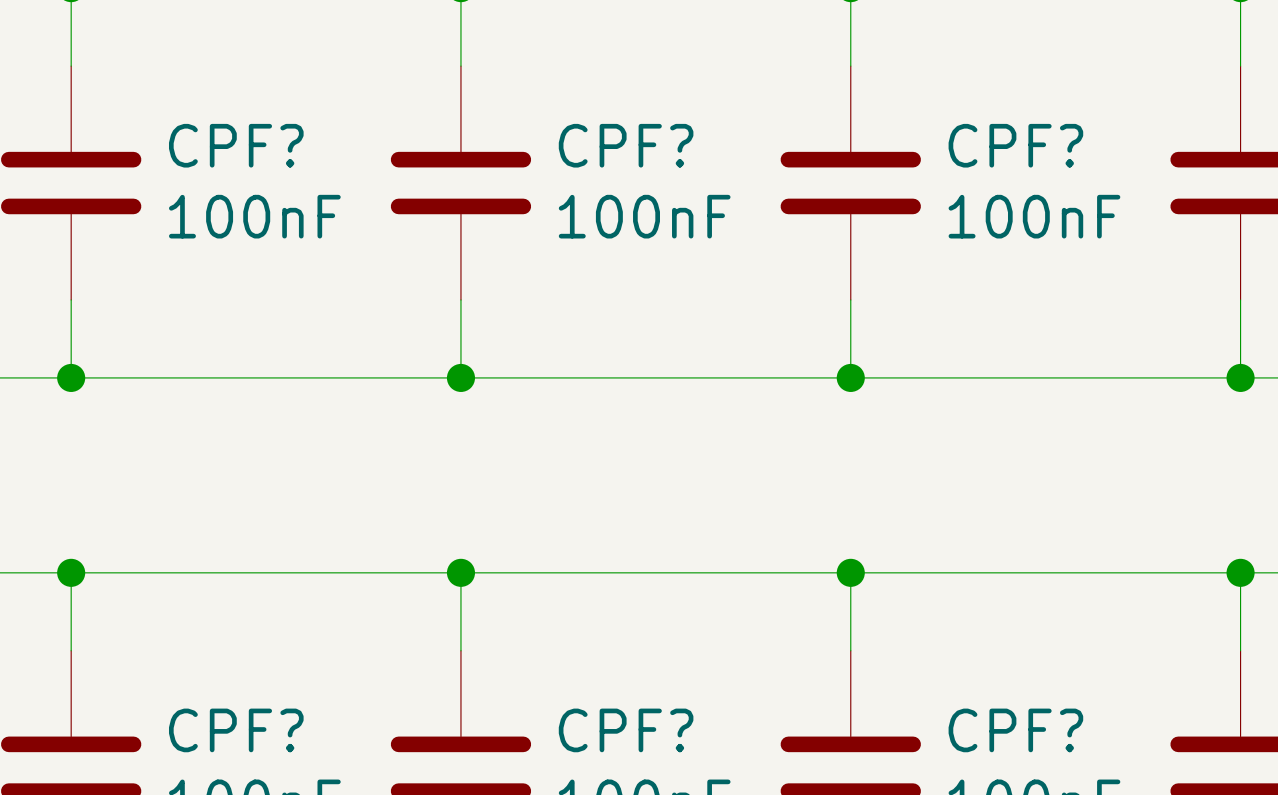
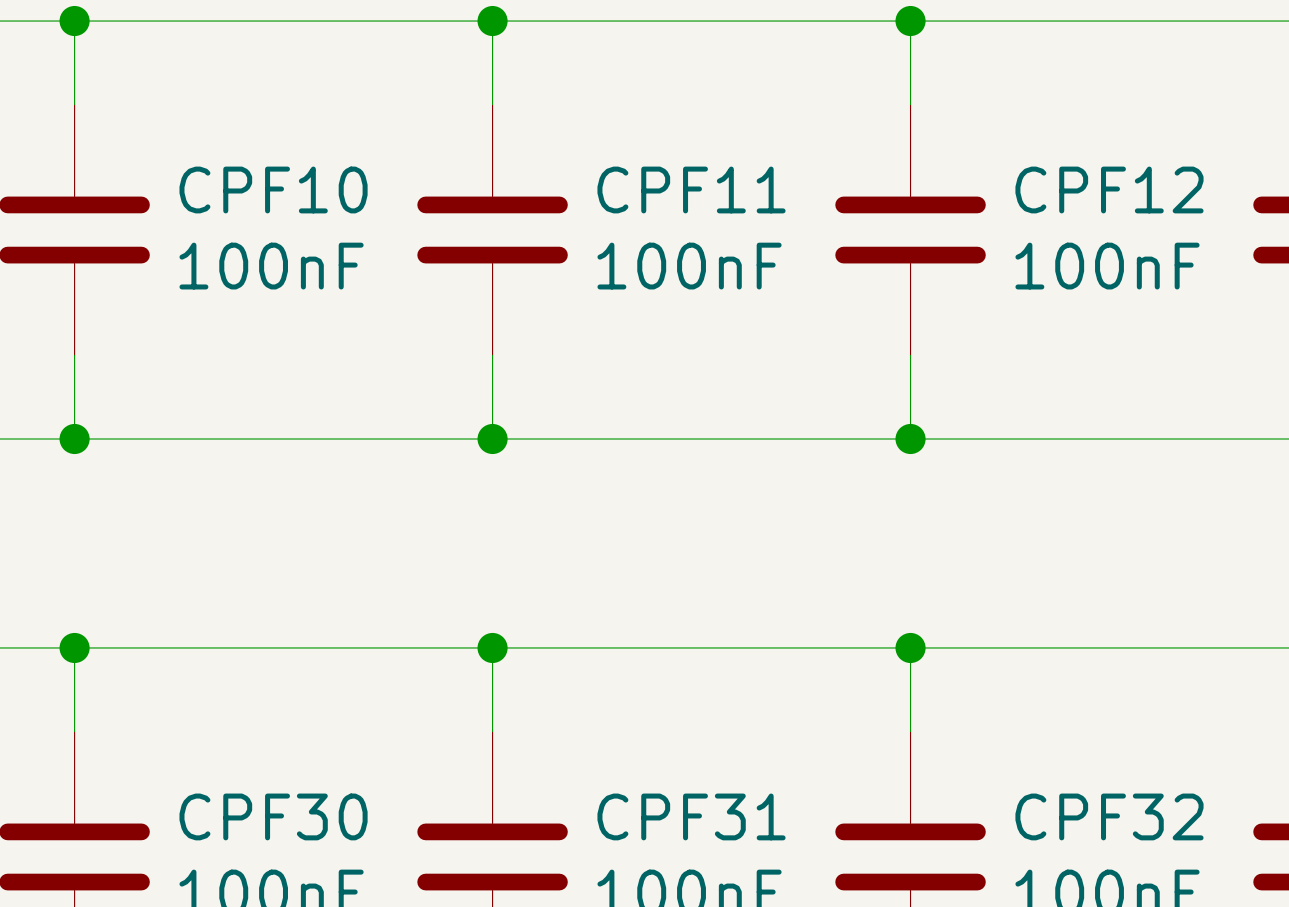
CPF? name: CPF? (236, 145) -> CPF10 (273, 189)
CPF? name: CPF? (626, 145) -> CPF11 (691, 189)
CPF? name: CPF? (1015, 145) -> CPF12 (1109, 189)
CPF? name: CPF? (236, 730) -> CPF30 (273, 816)
CPF? name: CPF? (626, 730) -> CPF31 (691, 816)
CPF? name: CPF? (1015, 730) -> CPF32 (1109, 816)

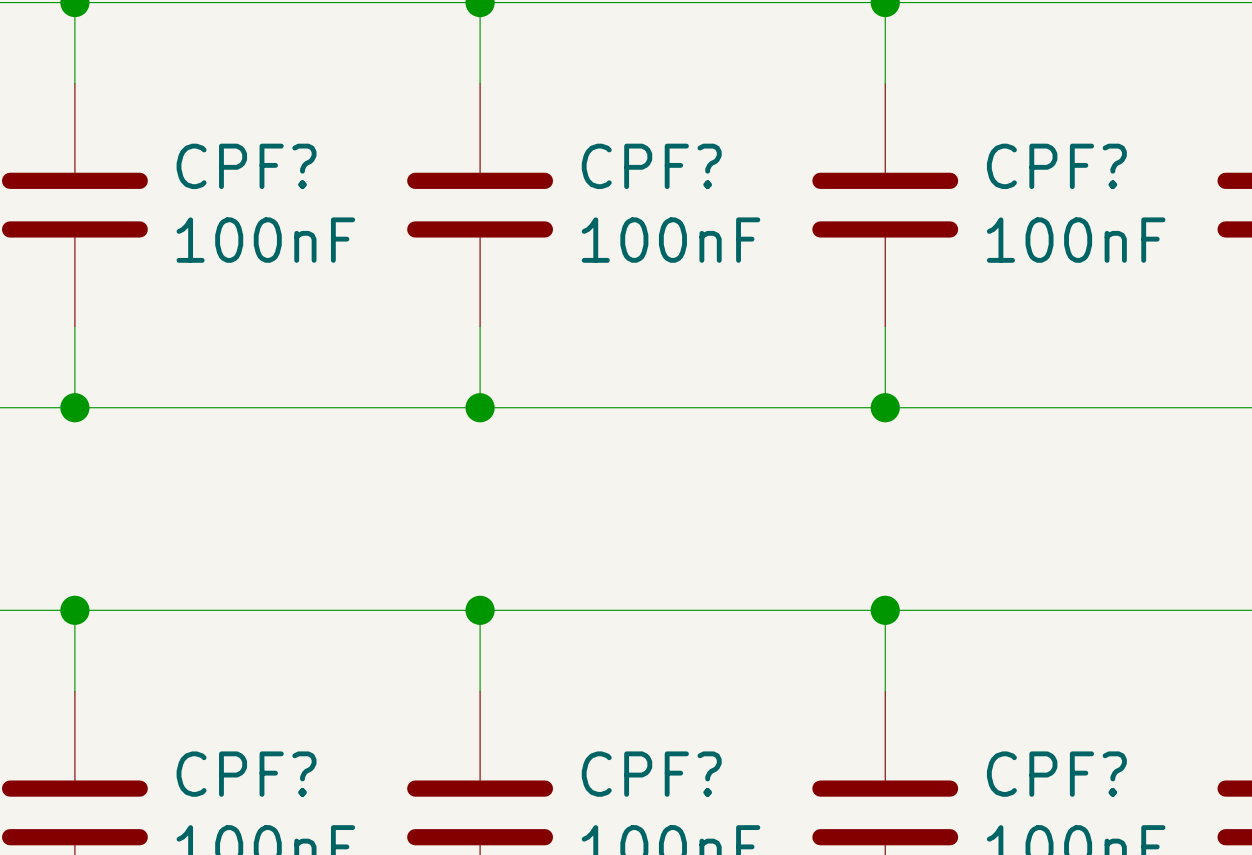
CPF10 name: CPF10 (273, 189) -> CPF? (246, 166)
CPF11 name: CPF11 (691, 189) -> CPF? (651, 166)
CPF12 name: CPF12 (1109, 189) -> CPF? (1056, 166)
CPF30 name: CPF30 (273, 816) -> CPF? (246, 774)
CPF31 name: CPF31 (691, 816) -> CPF? (651, 774)
CPF32 name: CPF32 (1109, 816) -> CPF? (1056, 774)

